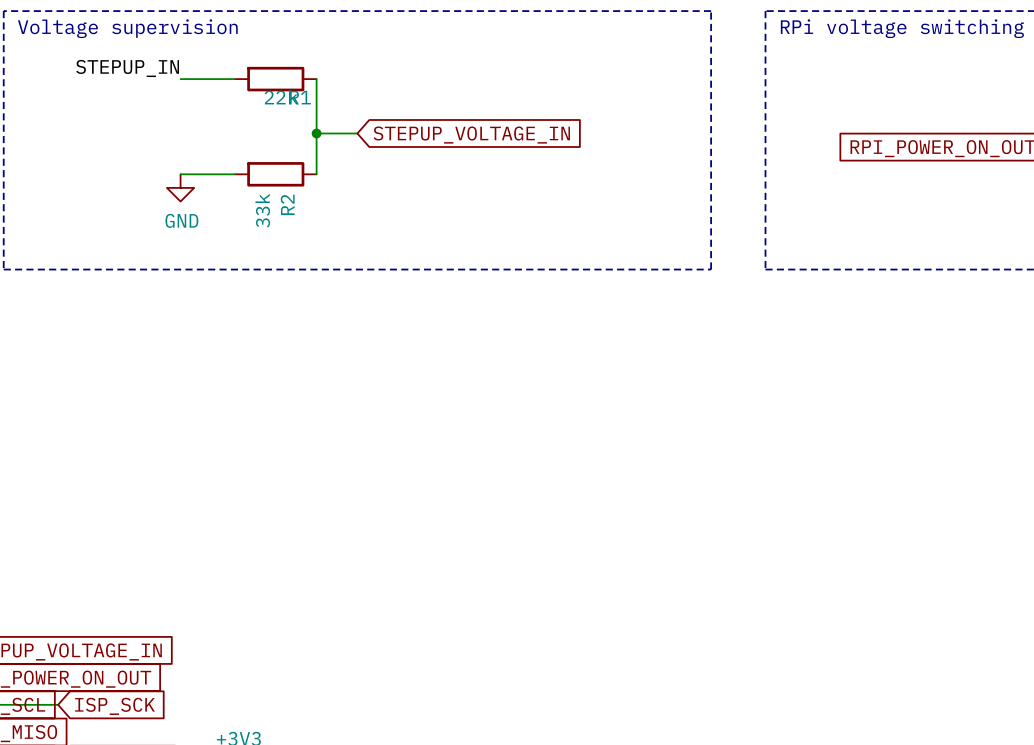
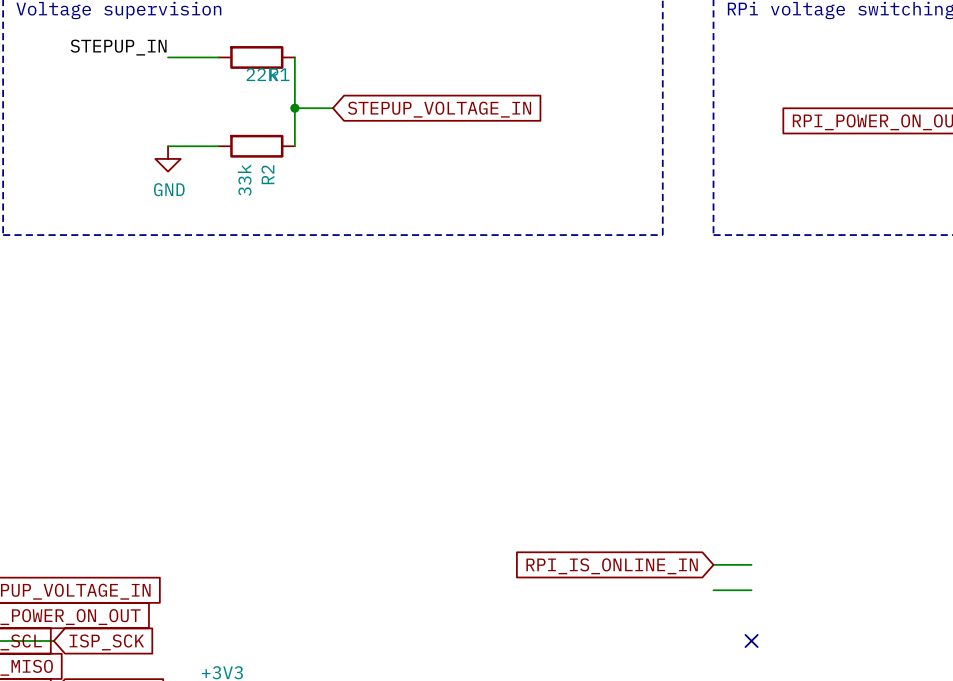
wire: none -> (713, 564) (751, 564)
global label: none -> RPI_IS_ONLINE_IN (612, 566)
wire: none -> (713, 590) (751, 590)
no-connect mark: none -> (751, 641)

